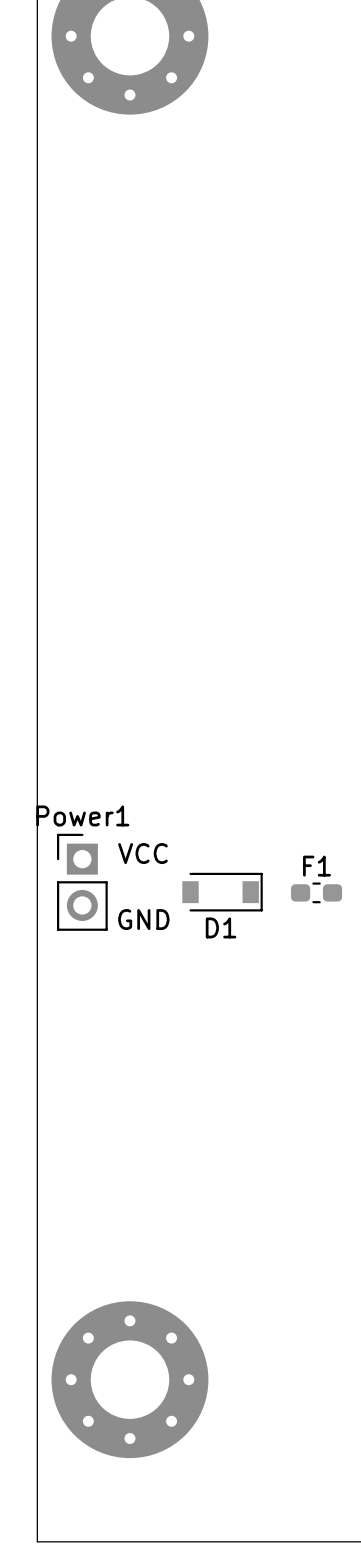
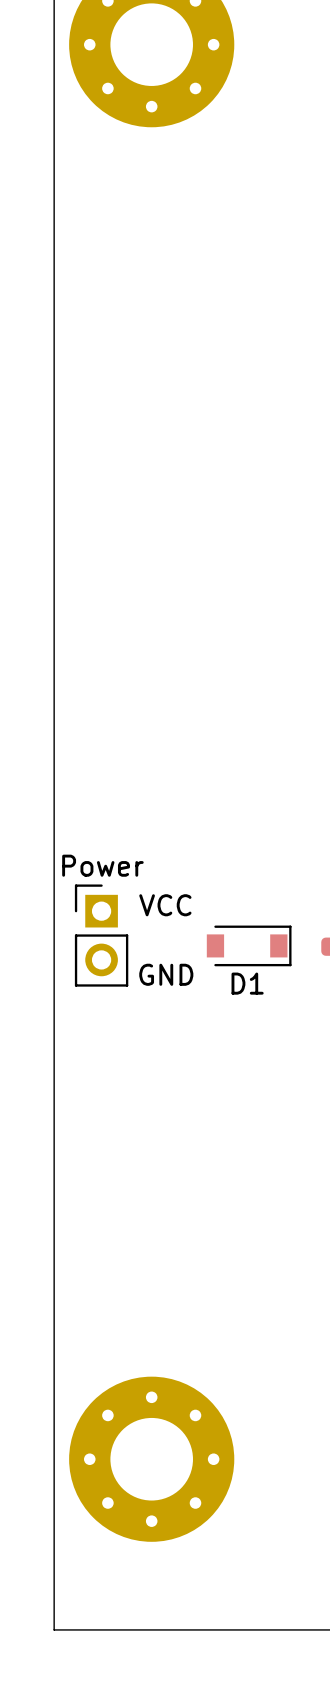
Power1 name: Power1 (82, 815) -> Power (102, 865)

